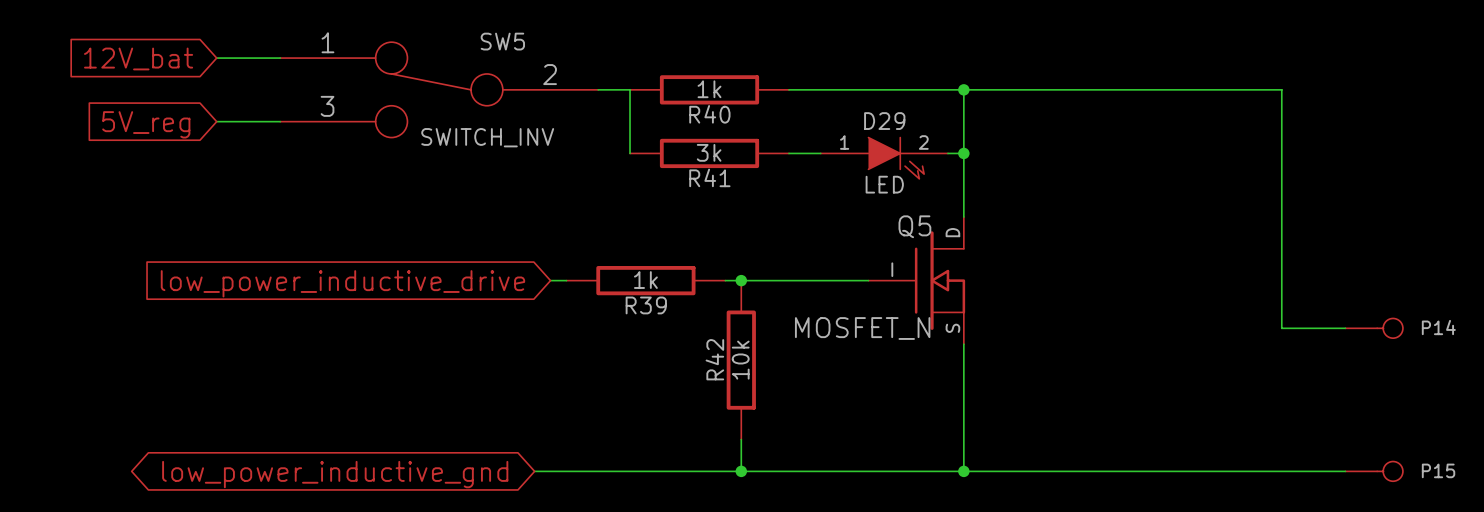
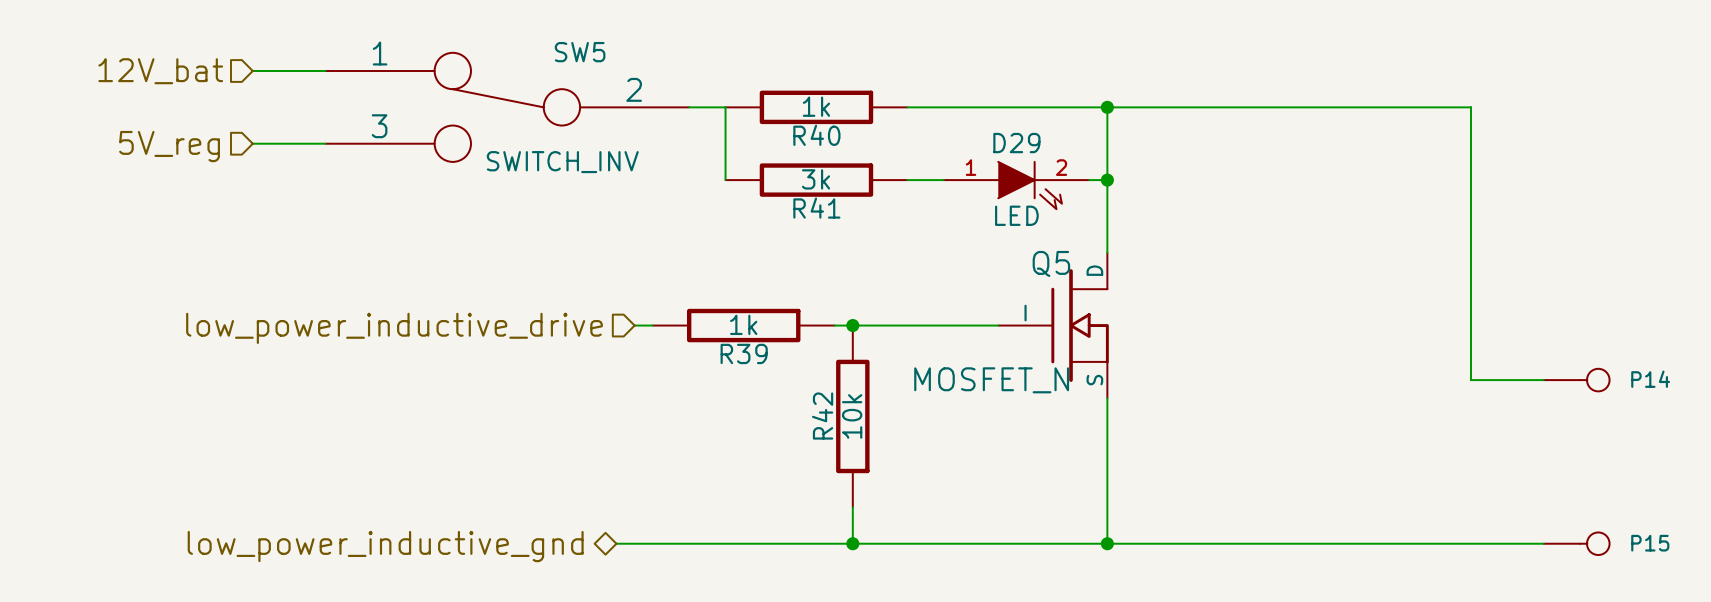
hierarchical label: none -> 12V_bat (160, 71)
global label: 12V_bat (138, 58) -> none
hierarchical label: none -> 5V_reg (169, 146)
global label: 5V_reg (146, 124) -> none
hierarchical label: none -> low_power_inductive_drive (394, 328)
global label: low_power_inductive_drive (342, 283) -> none
hierarchical label: none -> low_power_inductive_gnd (385, 546)
global label: low_power_inductive_gnd (335, 474) -> none

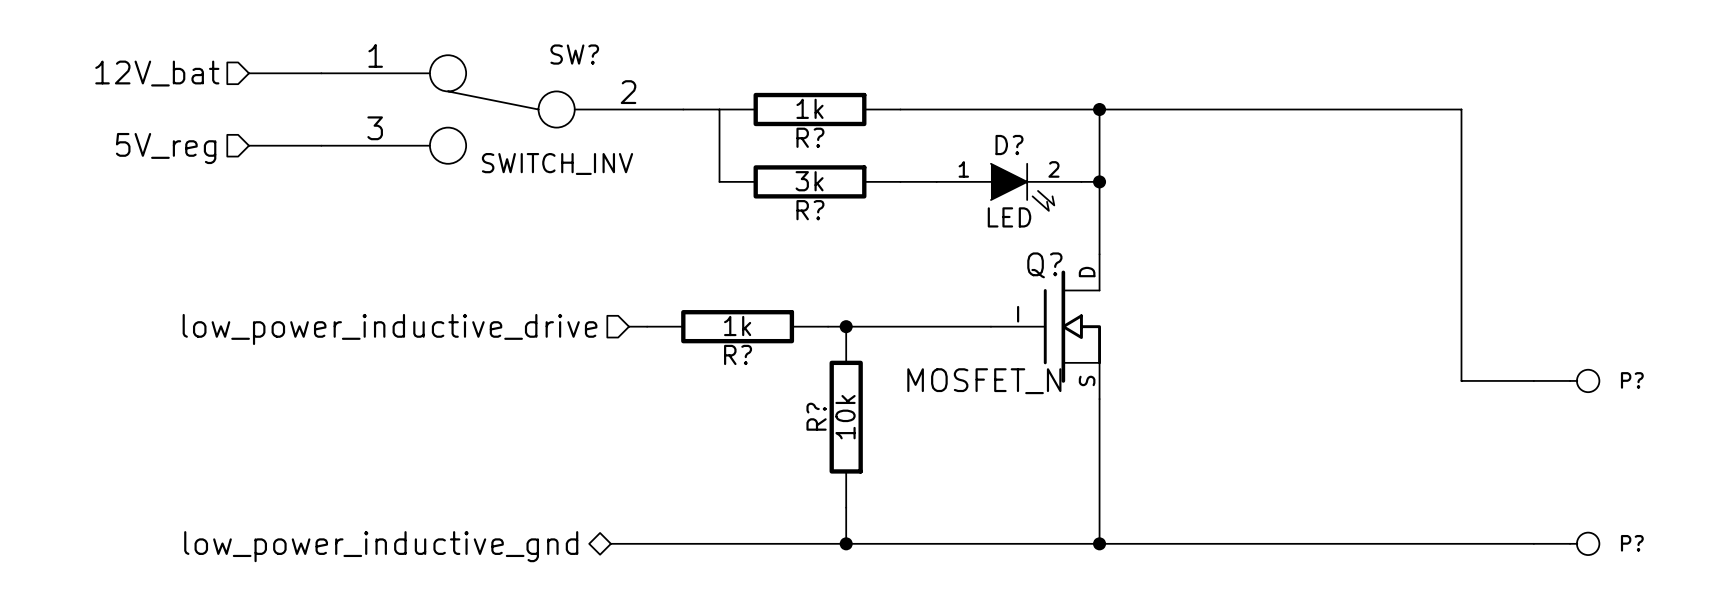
SW5 name: SW5 (580, 52) -> SW? (574, 54)
R40 name: R40 (816, 135) -> R? (810, 137)
D29 name: D29 (1016, 143) -> D? (1009, 145)
R41 name: R41 (816, 208) -> R? (810, 210)
Q5 name: Q5 (1051, 263) -> Q? (1044, 265)
R39 name: R39 (744, 353) -> R? (738, 354)
P14 name: P14 (1650, 379) -> P? (1632, 380)
R42 name: R42 (822, 416) -> R? (816, 416)
P15 name: P15 (1650, 543) -> P? (1632, 543)

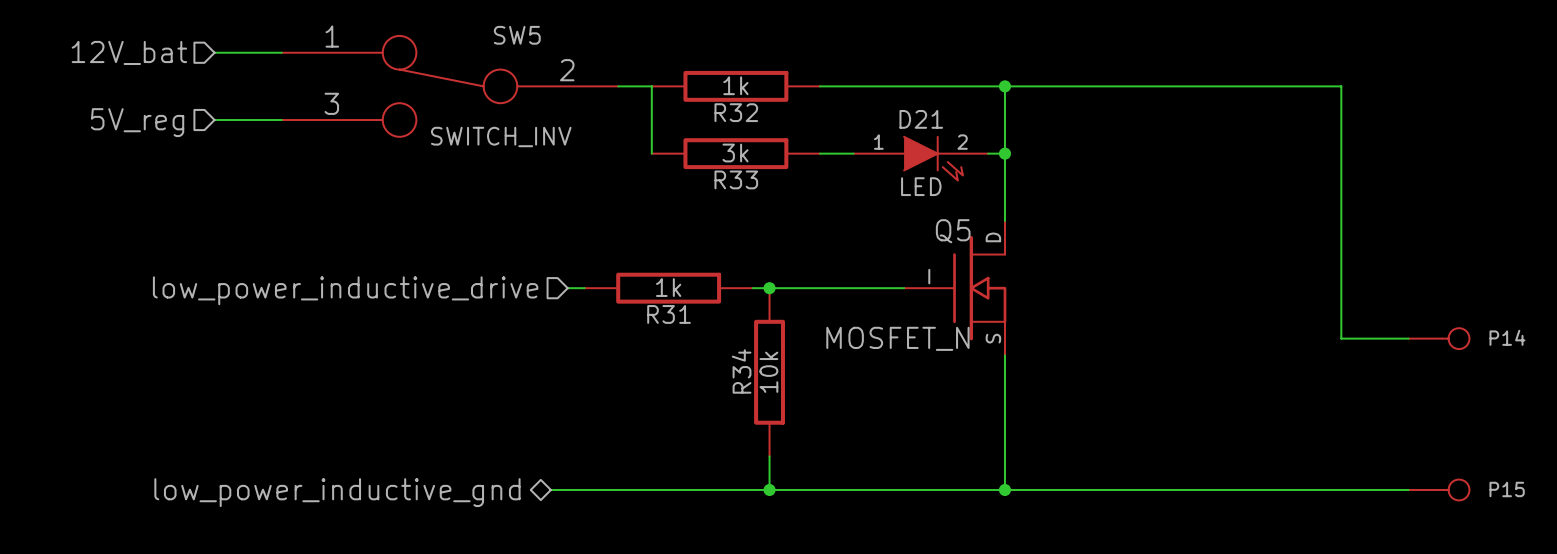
SW? name: SW? (574, 54) -> SW5 (517, 35)
R? name: R? (810, 137) -> R32 (736, 112)
D? name: D? (1009, 145) -> D21 (921, 119)
R? name: R? (810, 210) -> R33 (736, 179)
Q? name: Q? (1044, 265) -> Q5 (953, 231)
R? name: R? (738, 354) -> R31 (669, 314)
P? name: P? (1632, 380) -> P14 (1507, 337)
R? name: R? (816, 416) -> R34 (741, 371)
P? name: P? (1632, 543) -> P15 (1507, 489)

